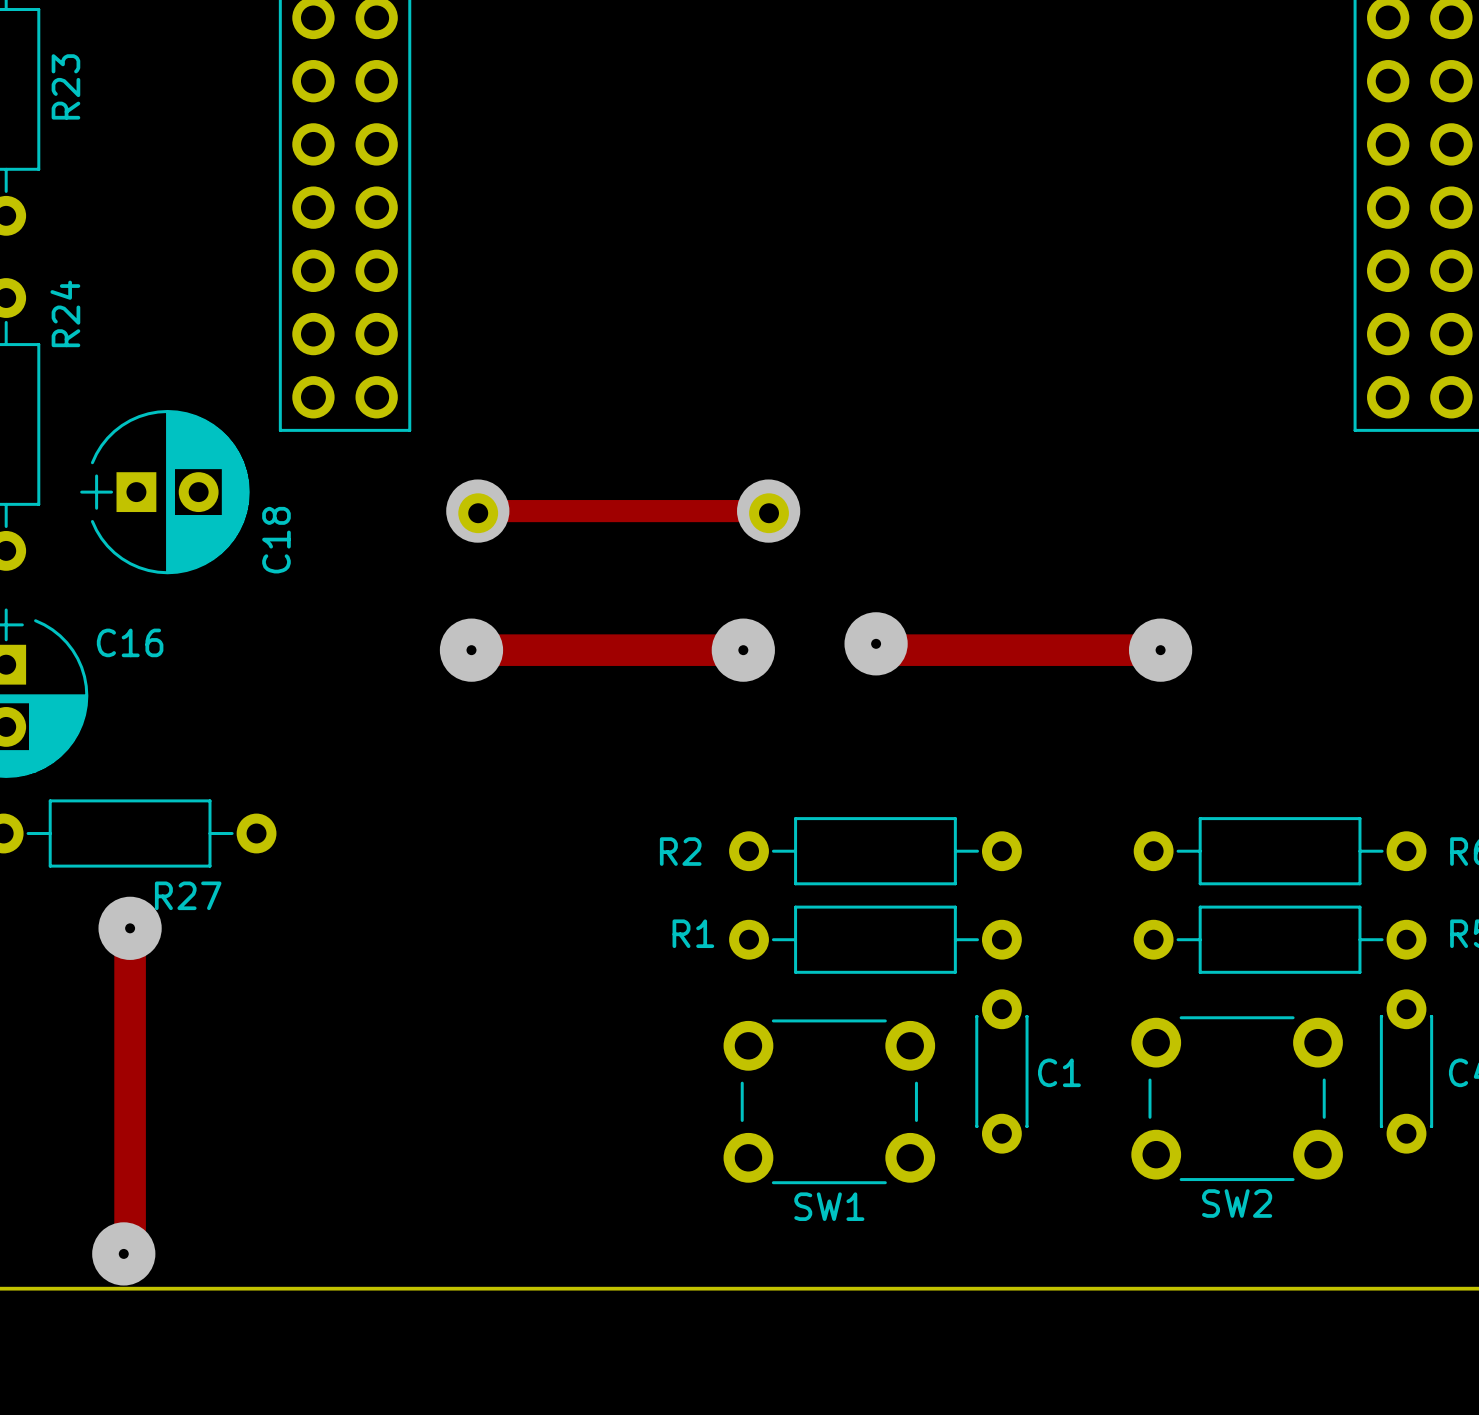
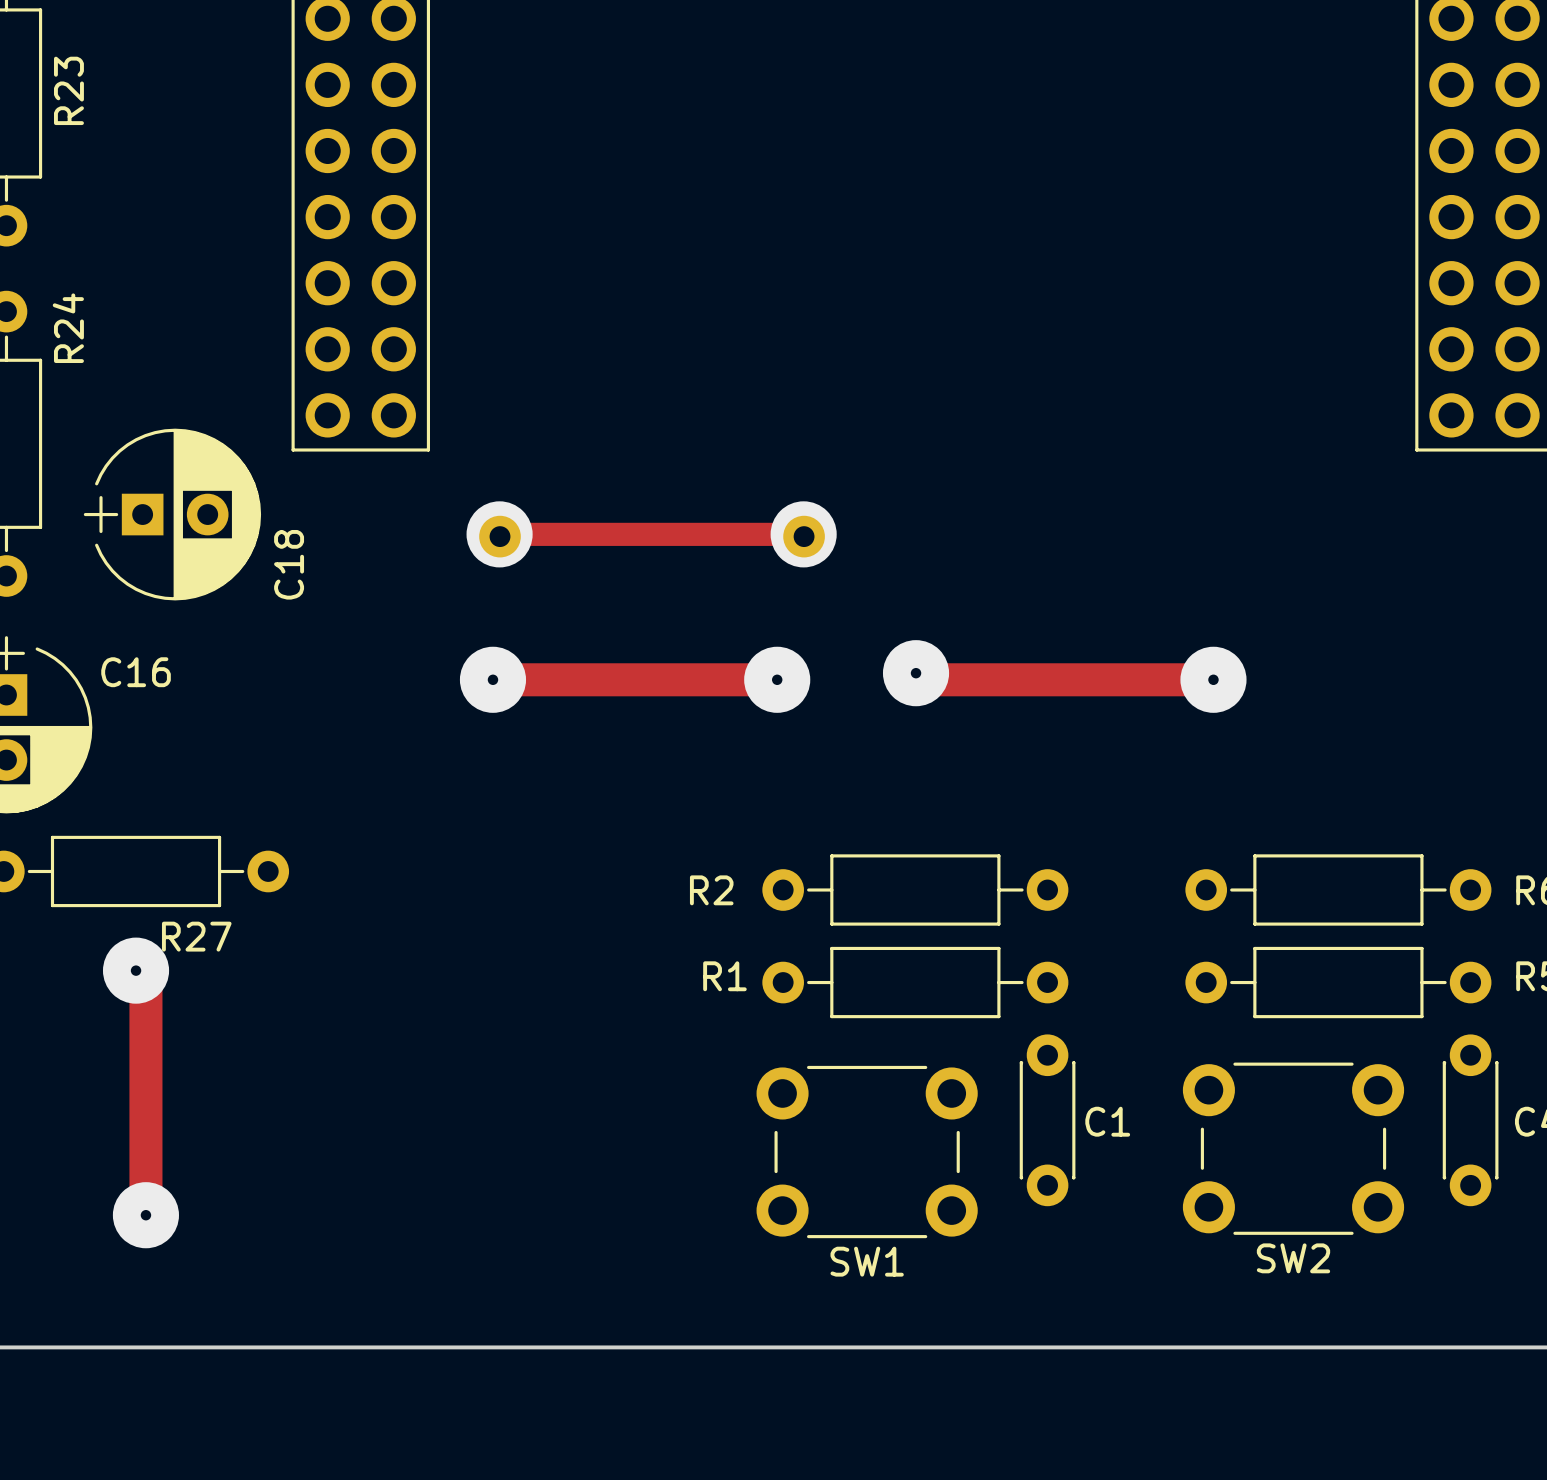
track: (130, 928) (130, 1247) (123, 1253) -> none
track: none -> (139, 973) (145, 980) (145, 1215)
via position: (123, 1253) -> (145, 1215)

